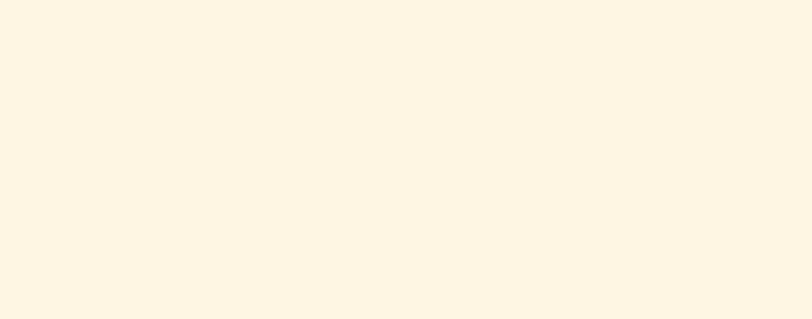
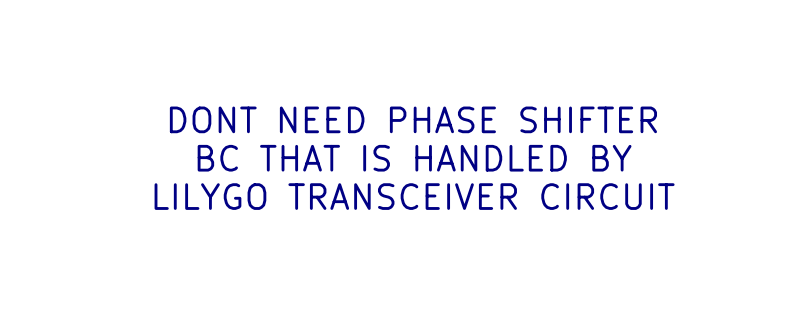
text: none -> DONT NEED PHASE SHIFTER (413, 119)
text: none -> BC THAT IS HANDLED BY (414, 158)
text: none -> LILYGO TRANSCEIVER CIRCUIT (414, 196)

